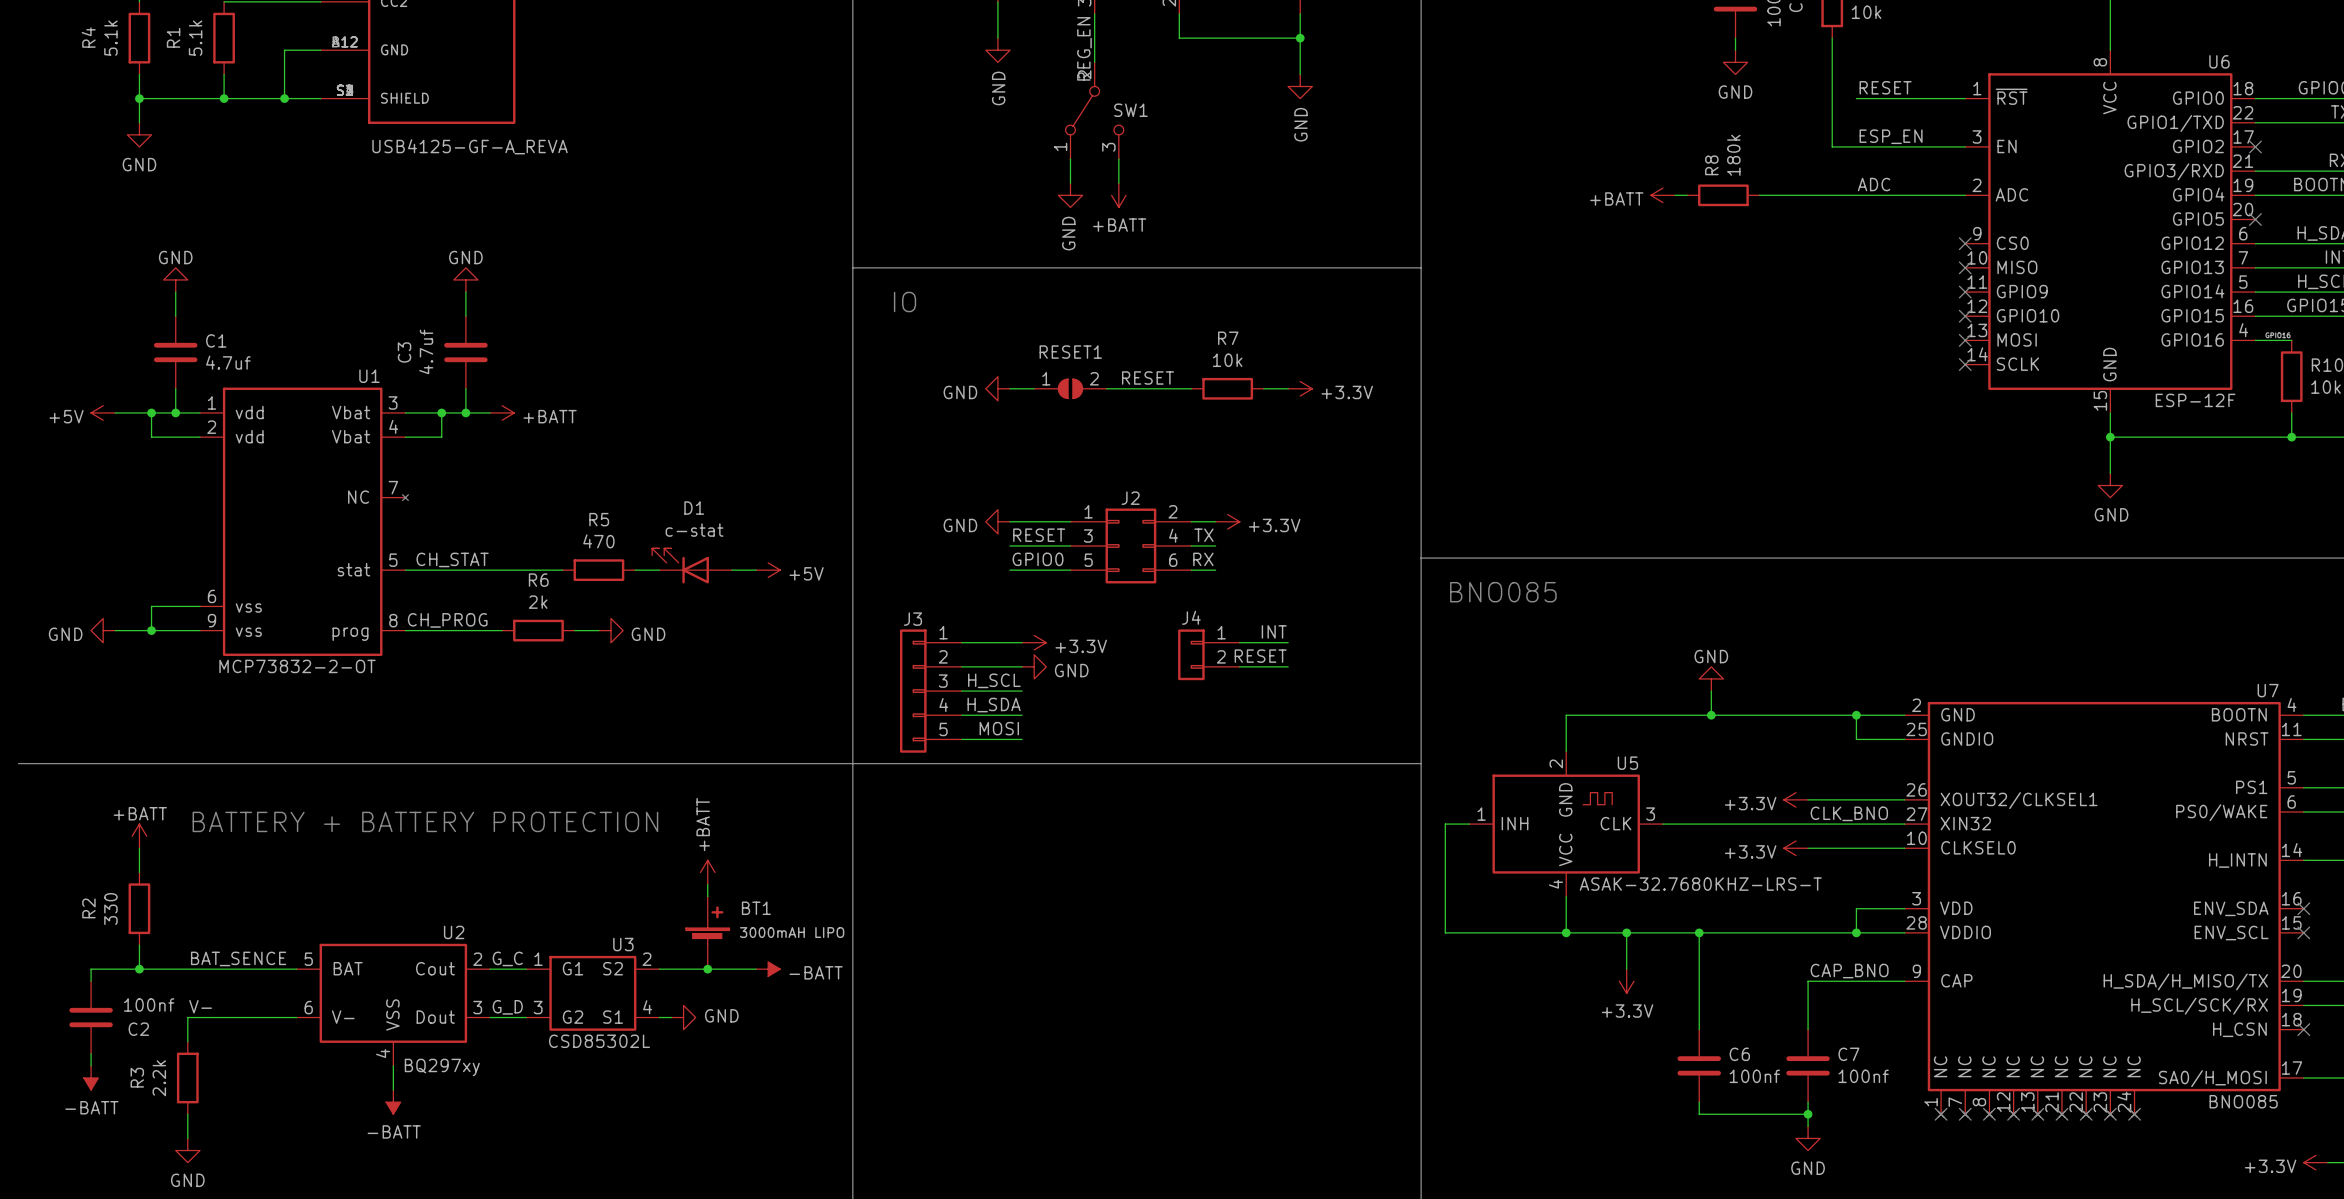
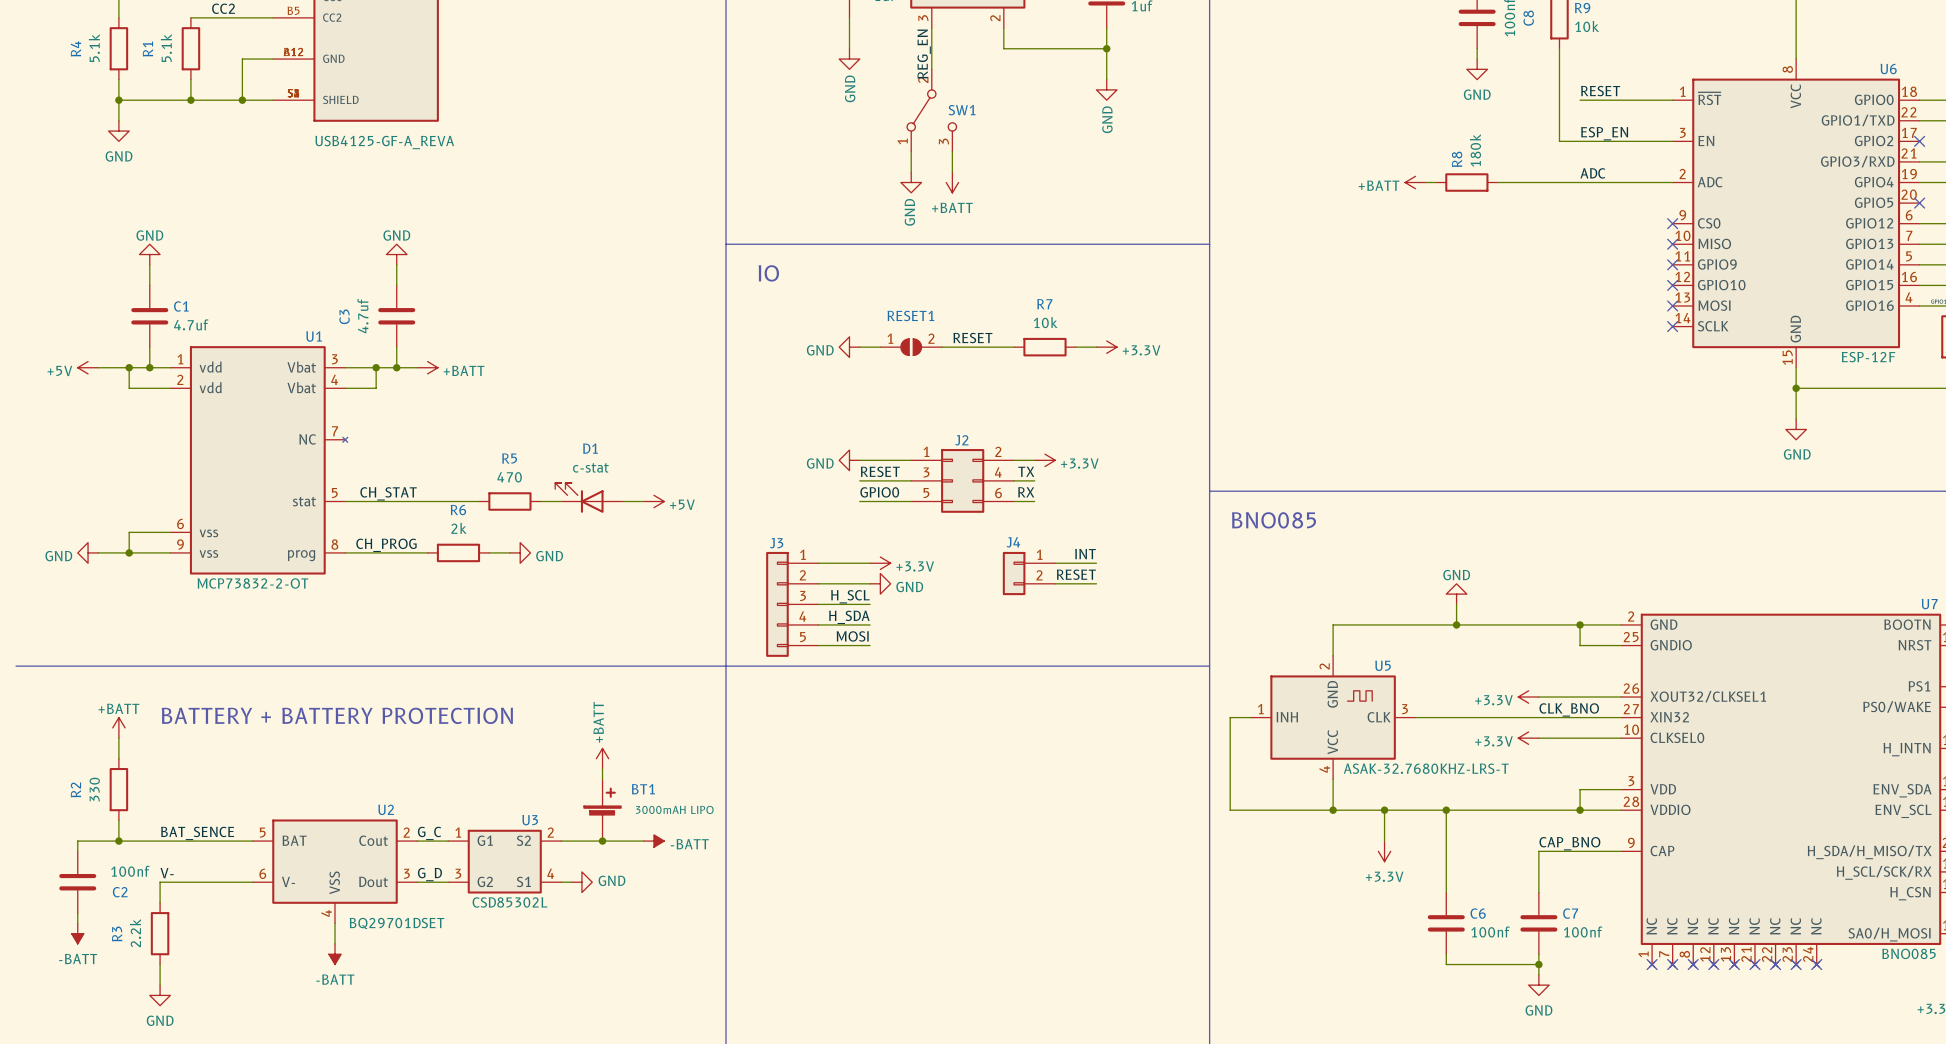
U2 value: BQ297xy (442, 1067) -> BQ29701DSET (396, 923)

